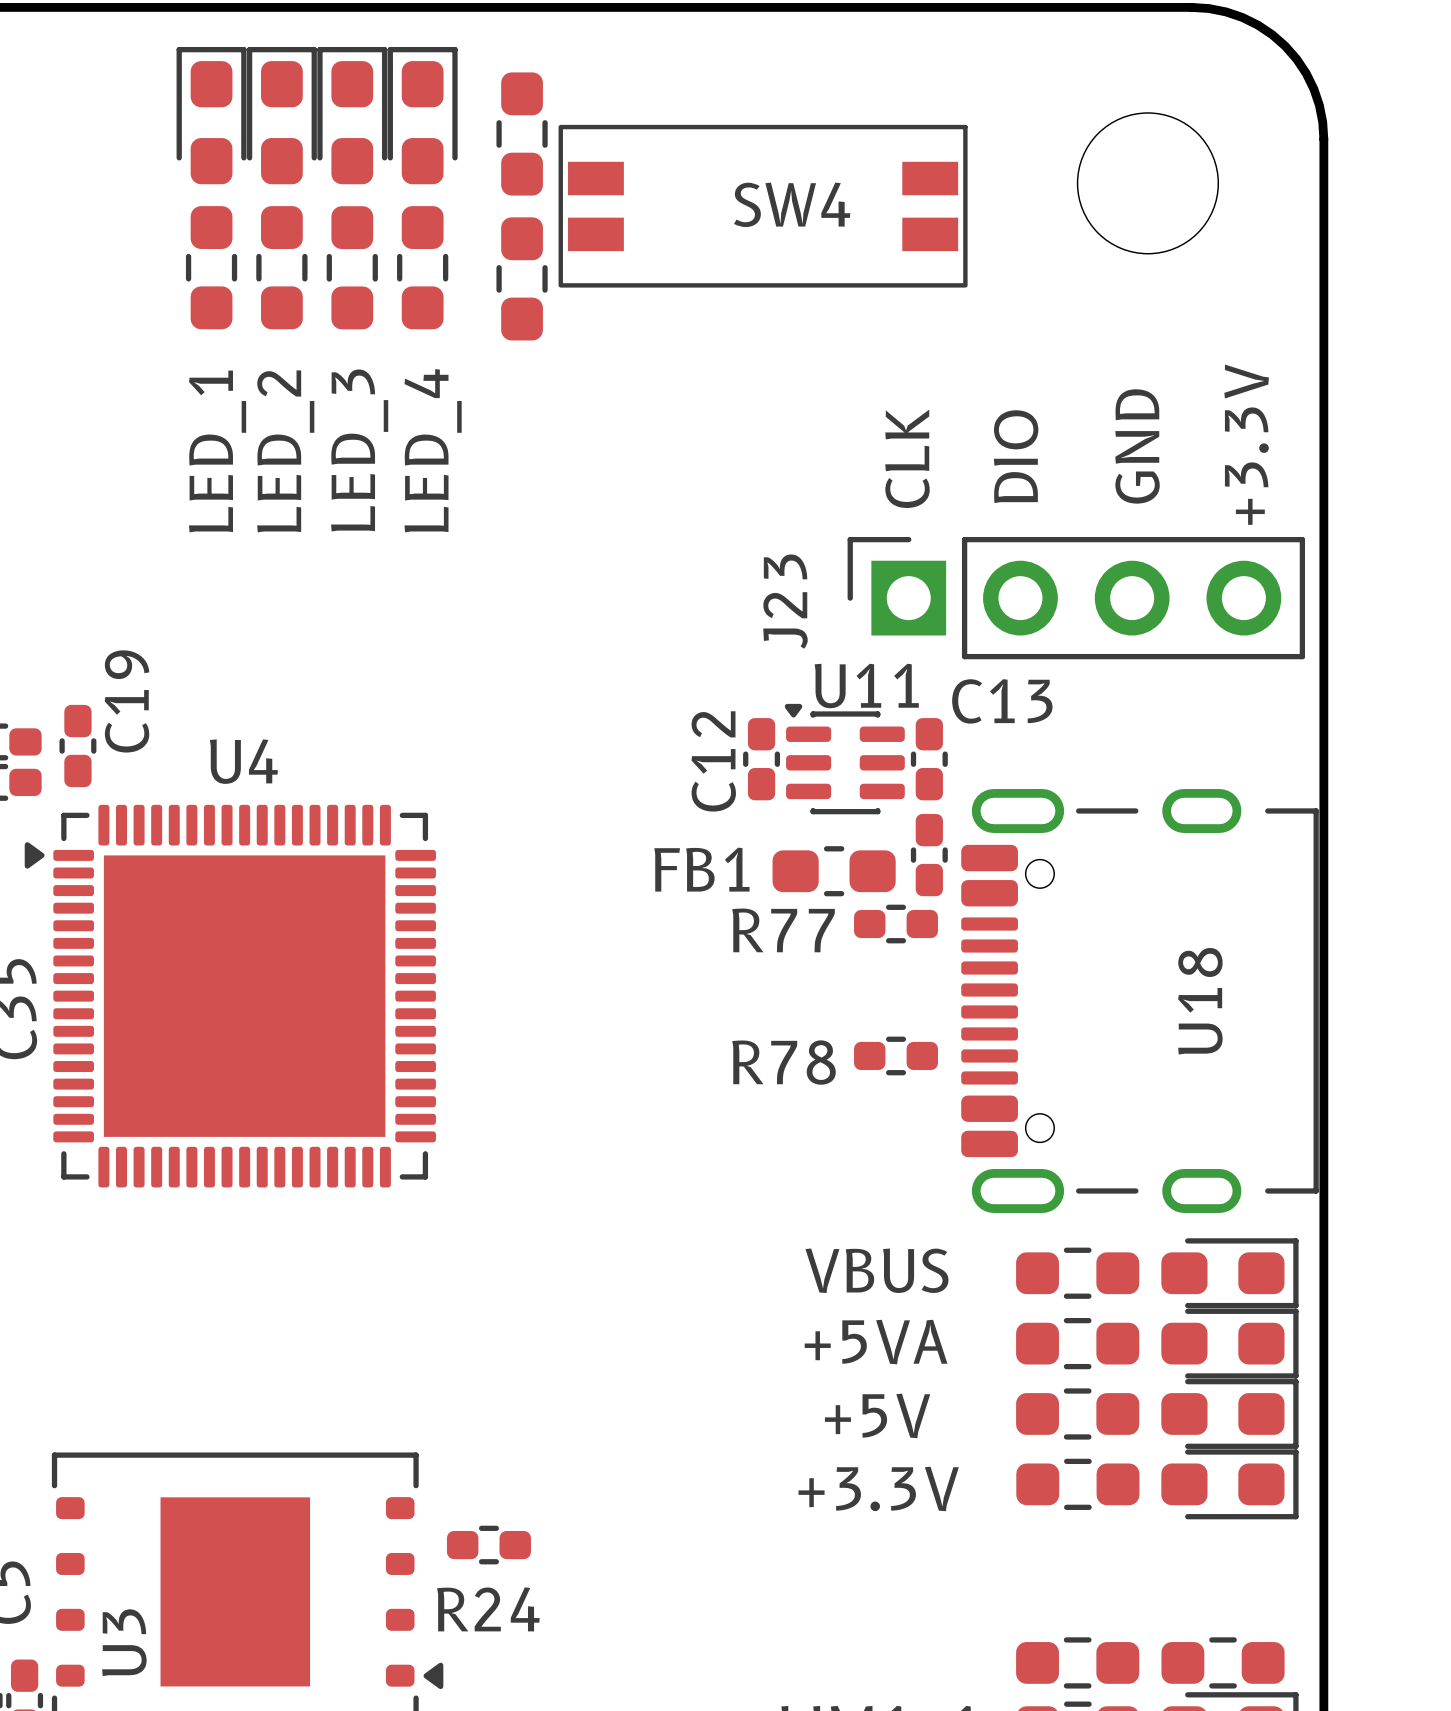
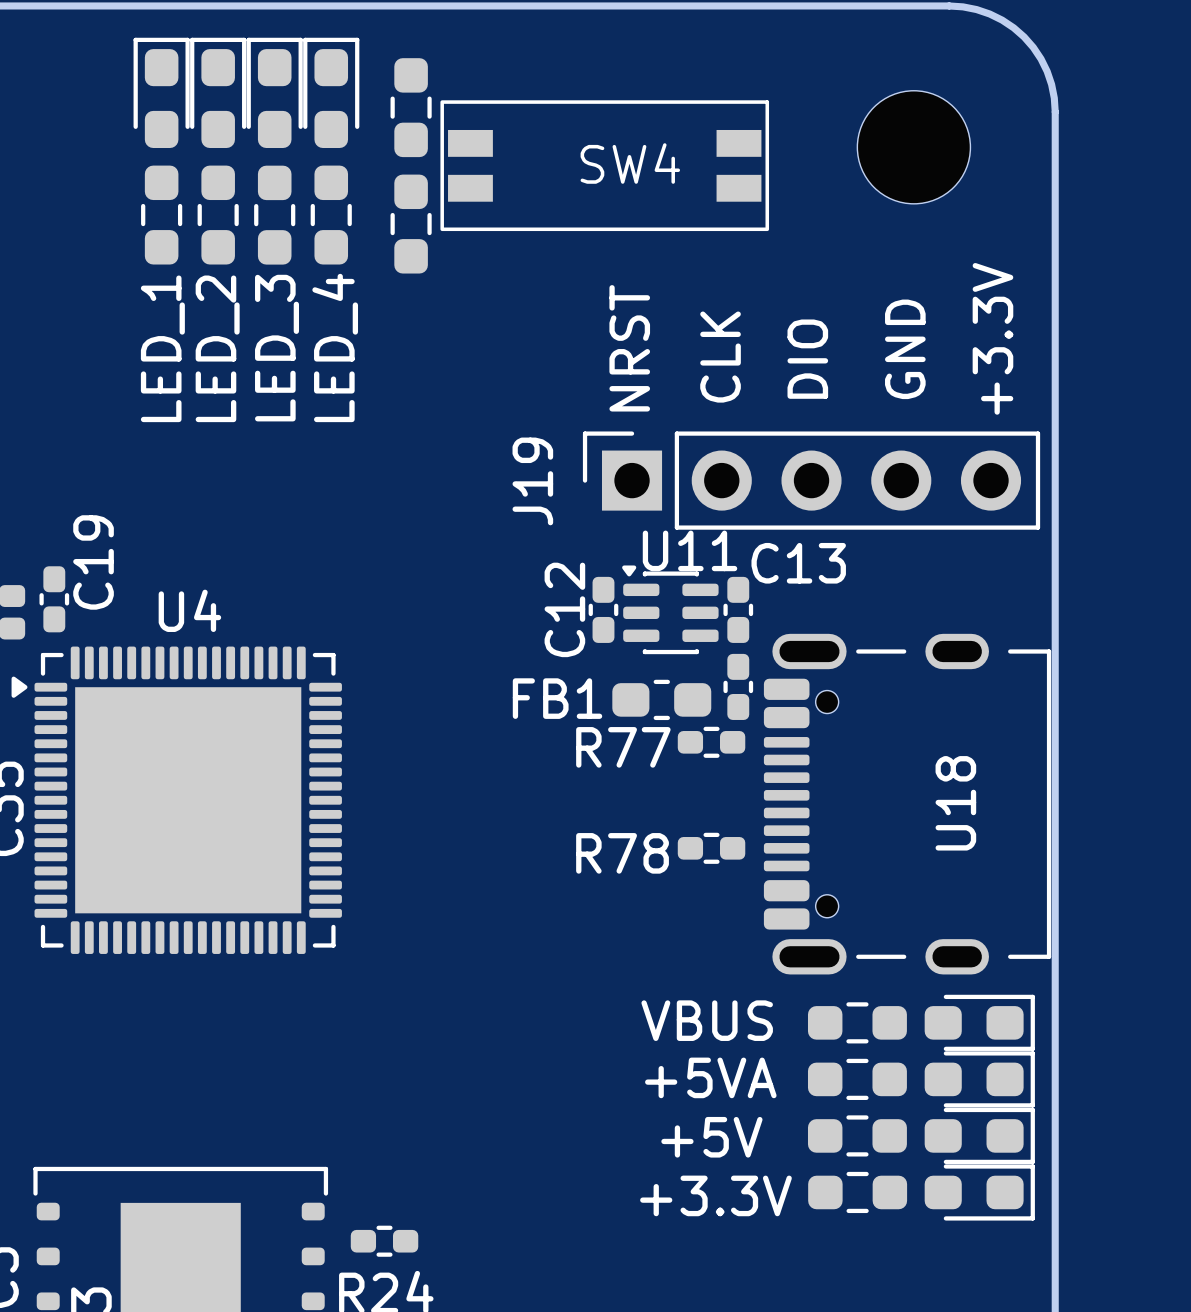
text: none -> NRST (629, 348)
J19: none -> (811, 480)
J23: (1076, 598) -> none

